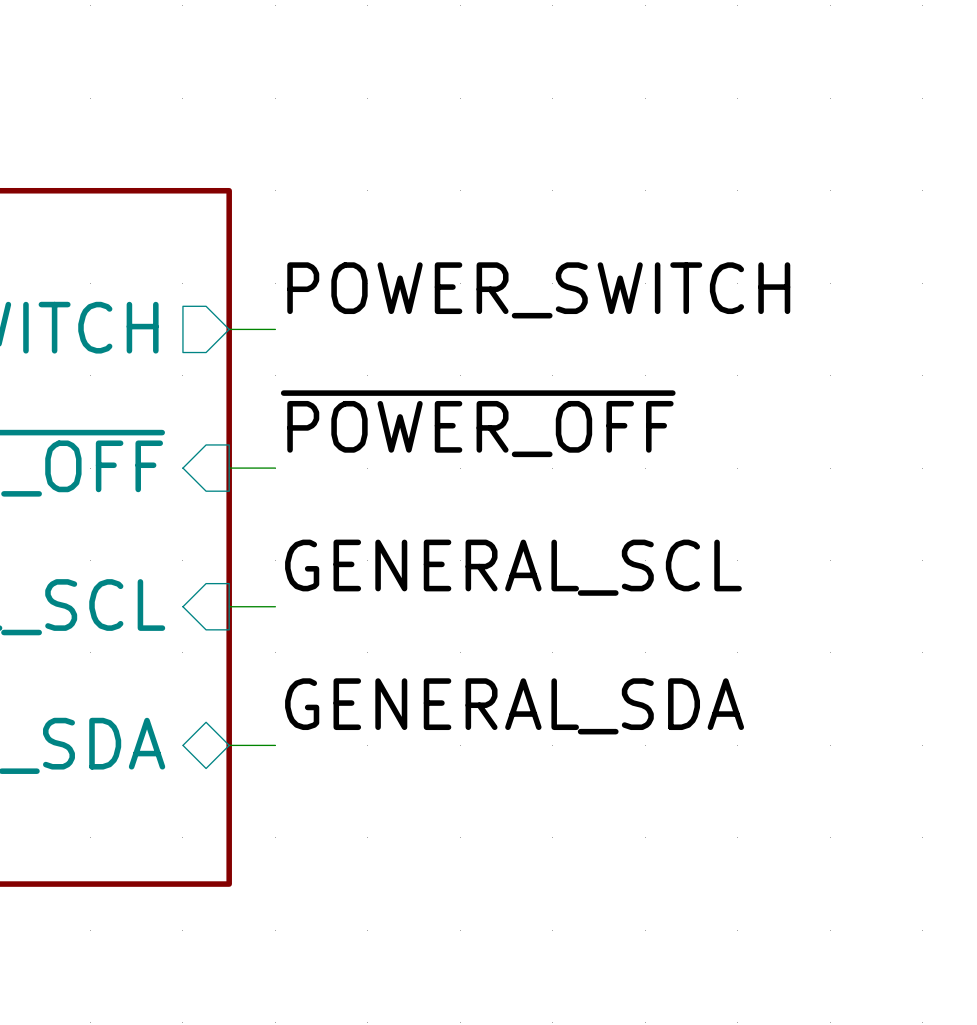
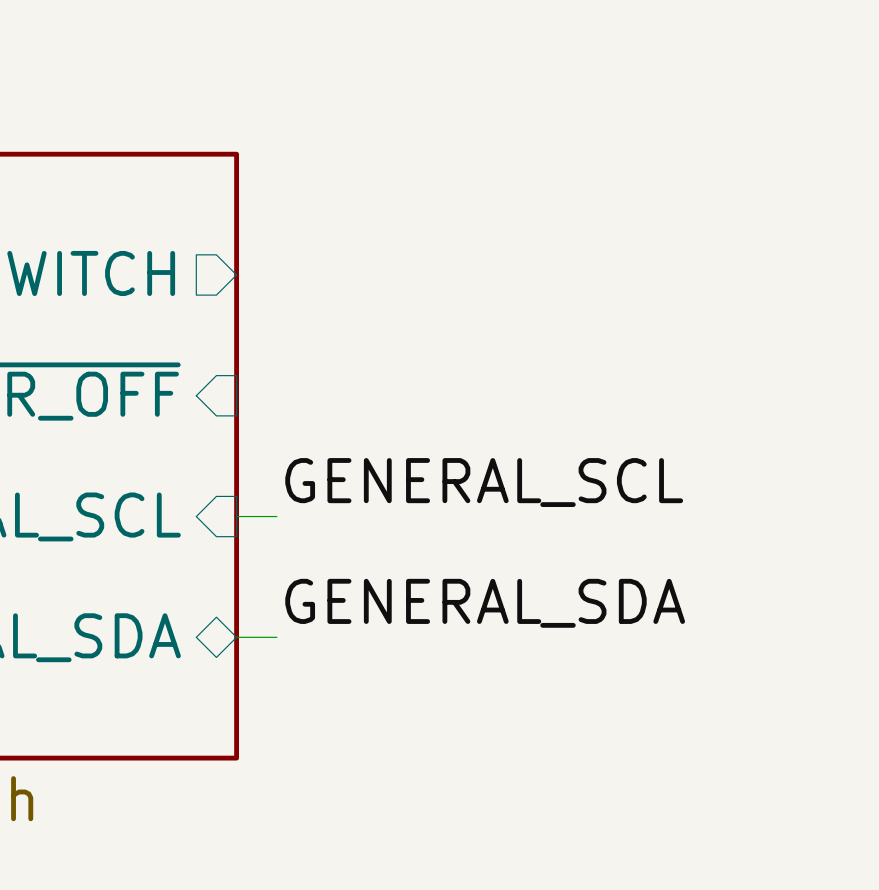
label: POWER_SWITCH (538, 290) -> none
wire: (229, 329) (275, 329) -> none
label: ~{POWER_OFF} (478, 423) -> none
wire: (229, 468) (275, 468) -> none

